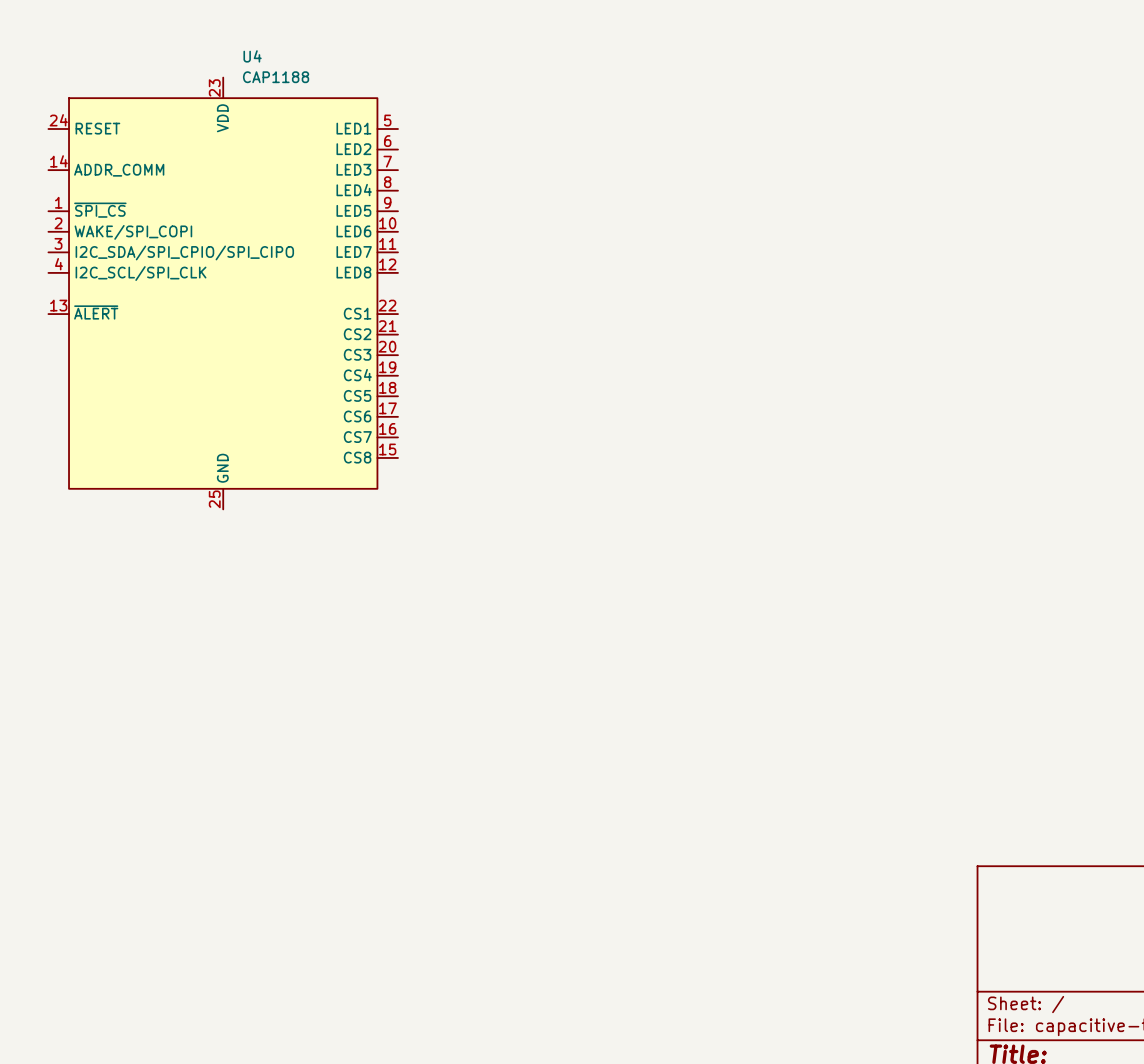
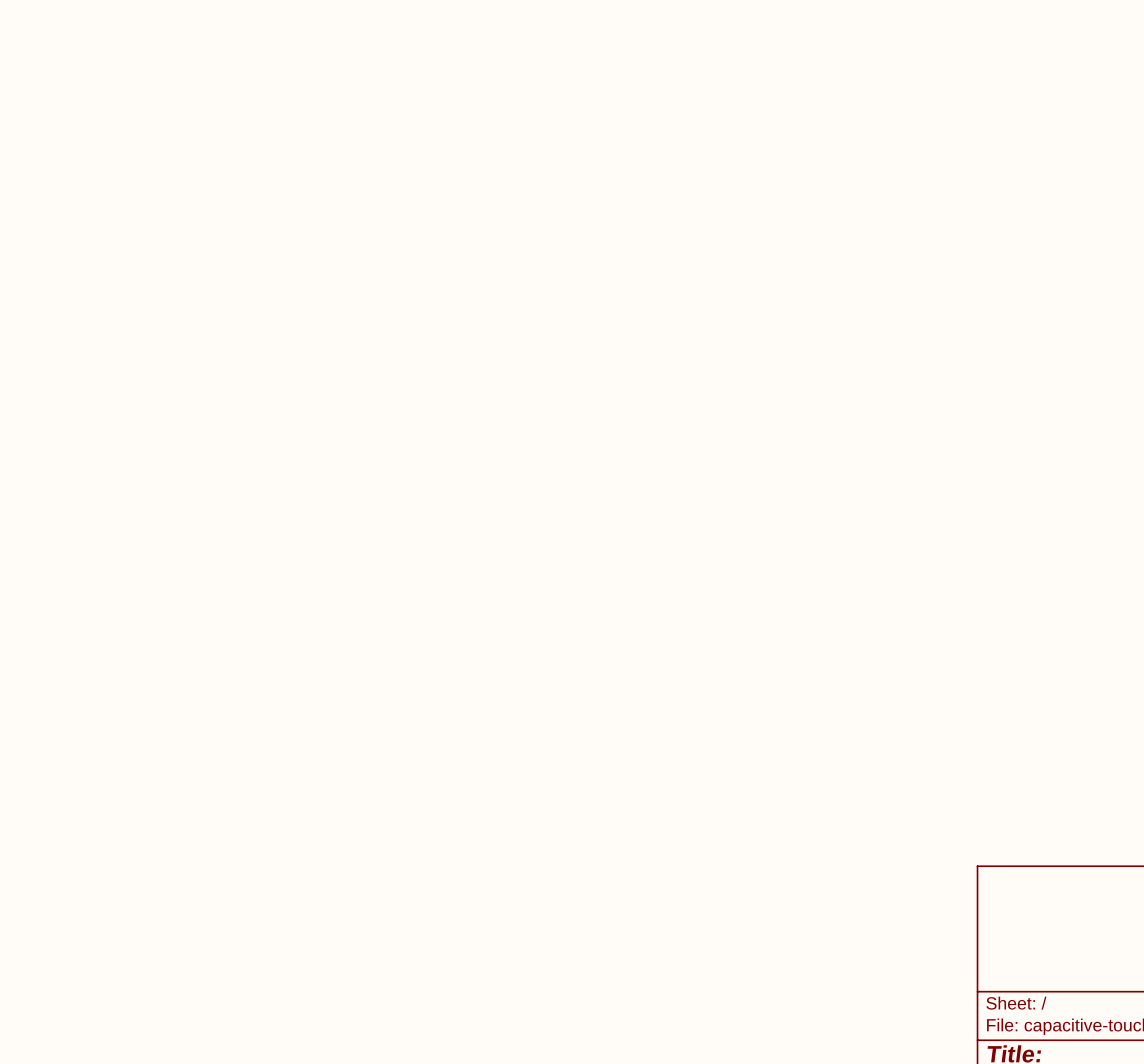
U4: CAP1188 (223, 293) -> none

